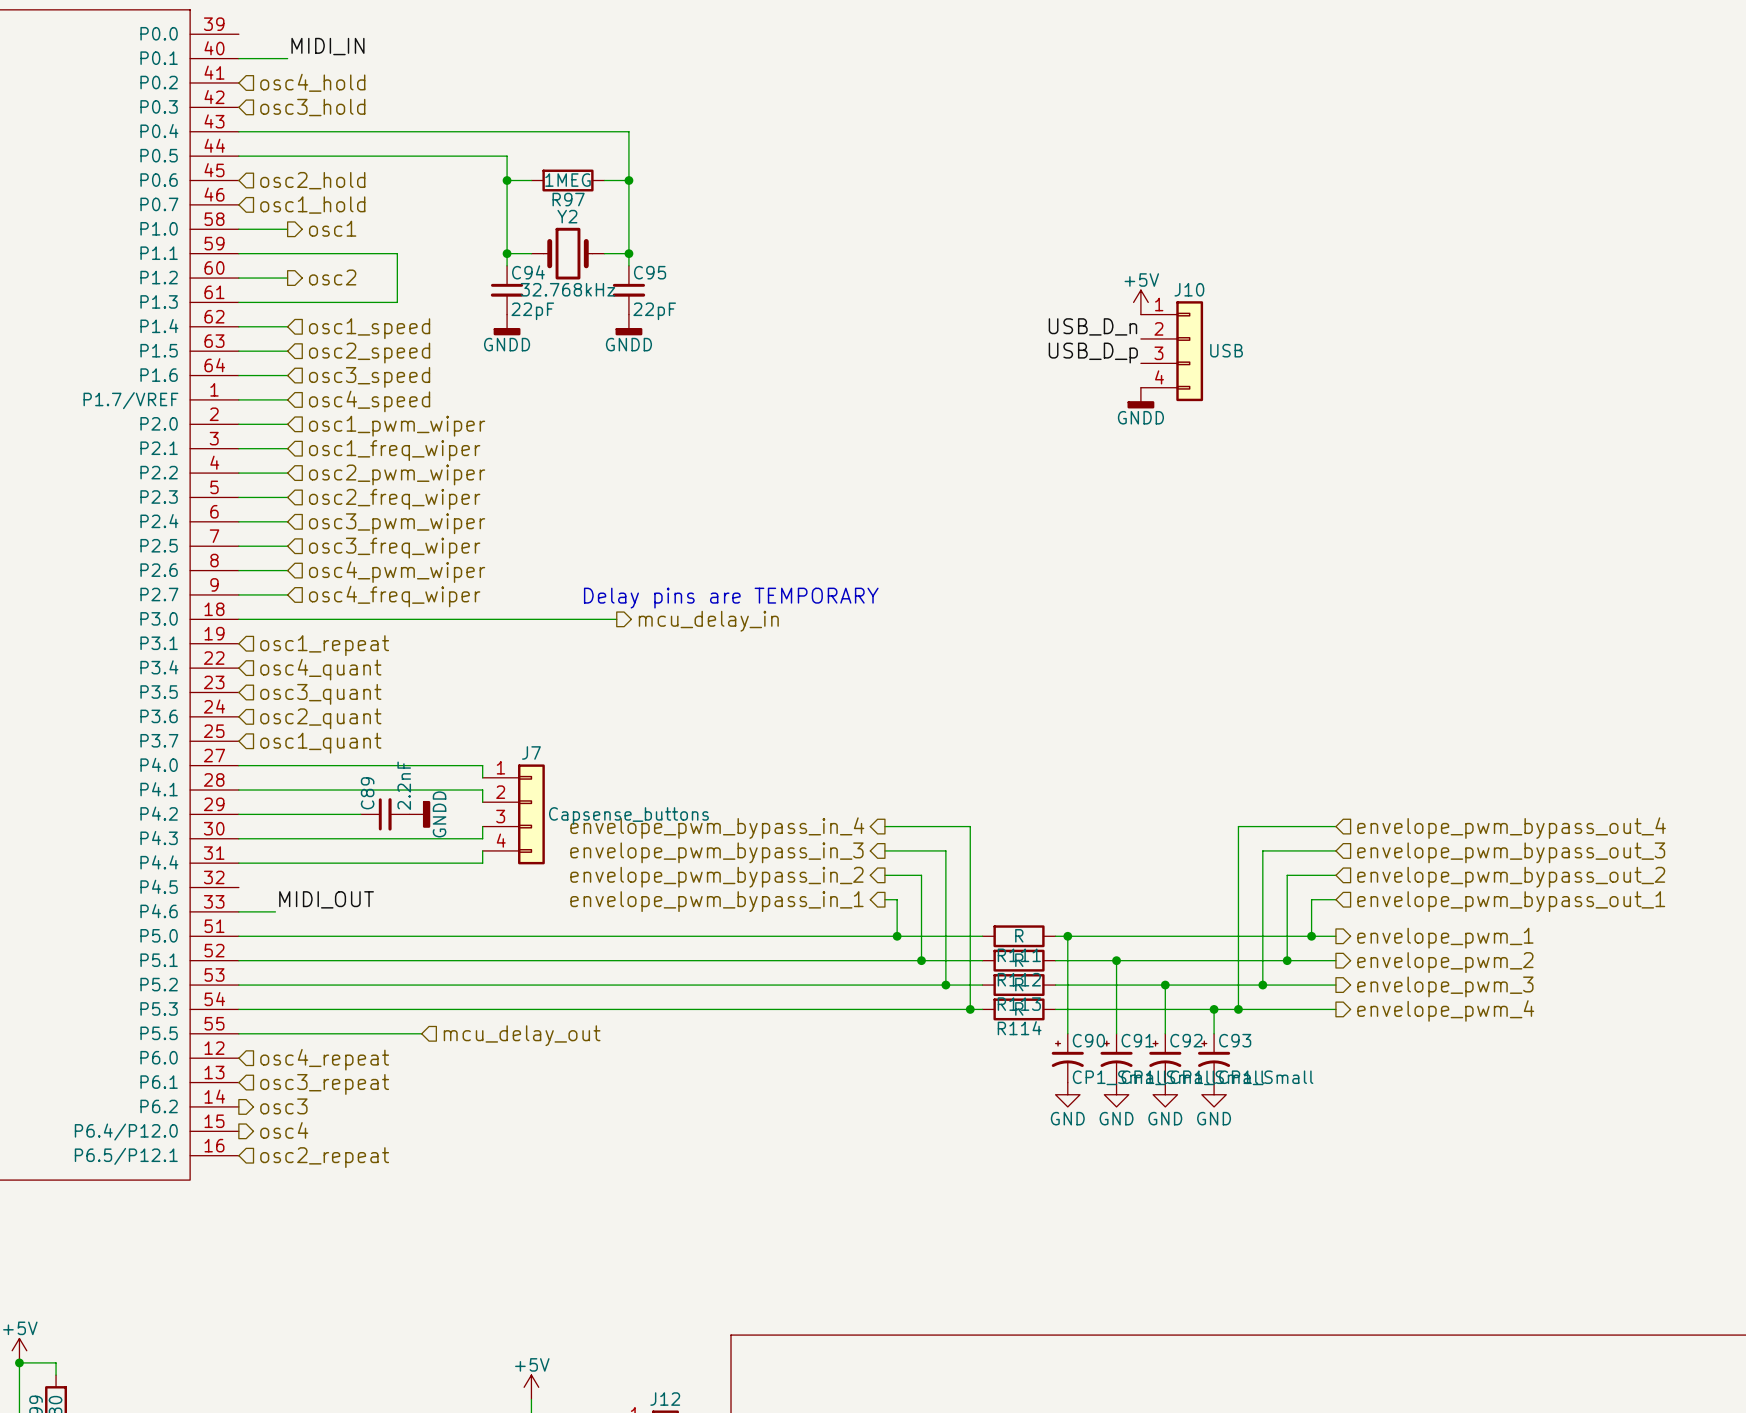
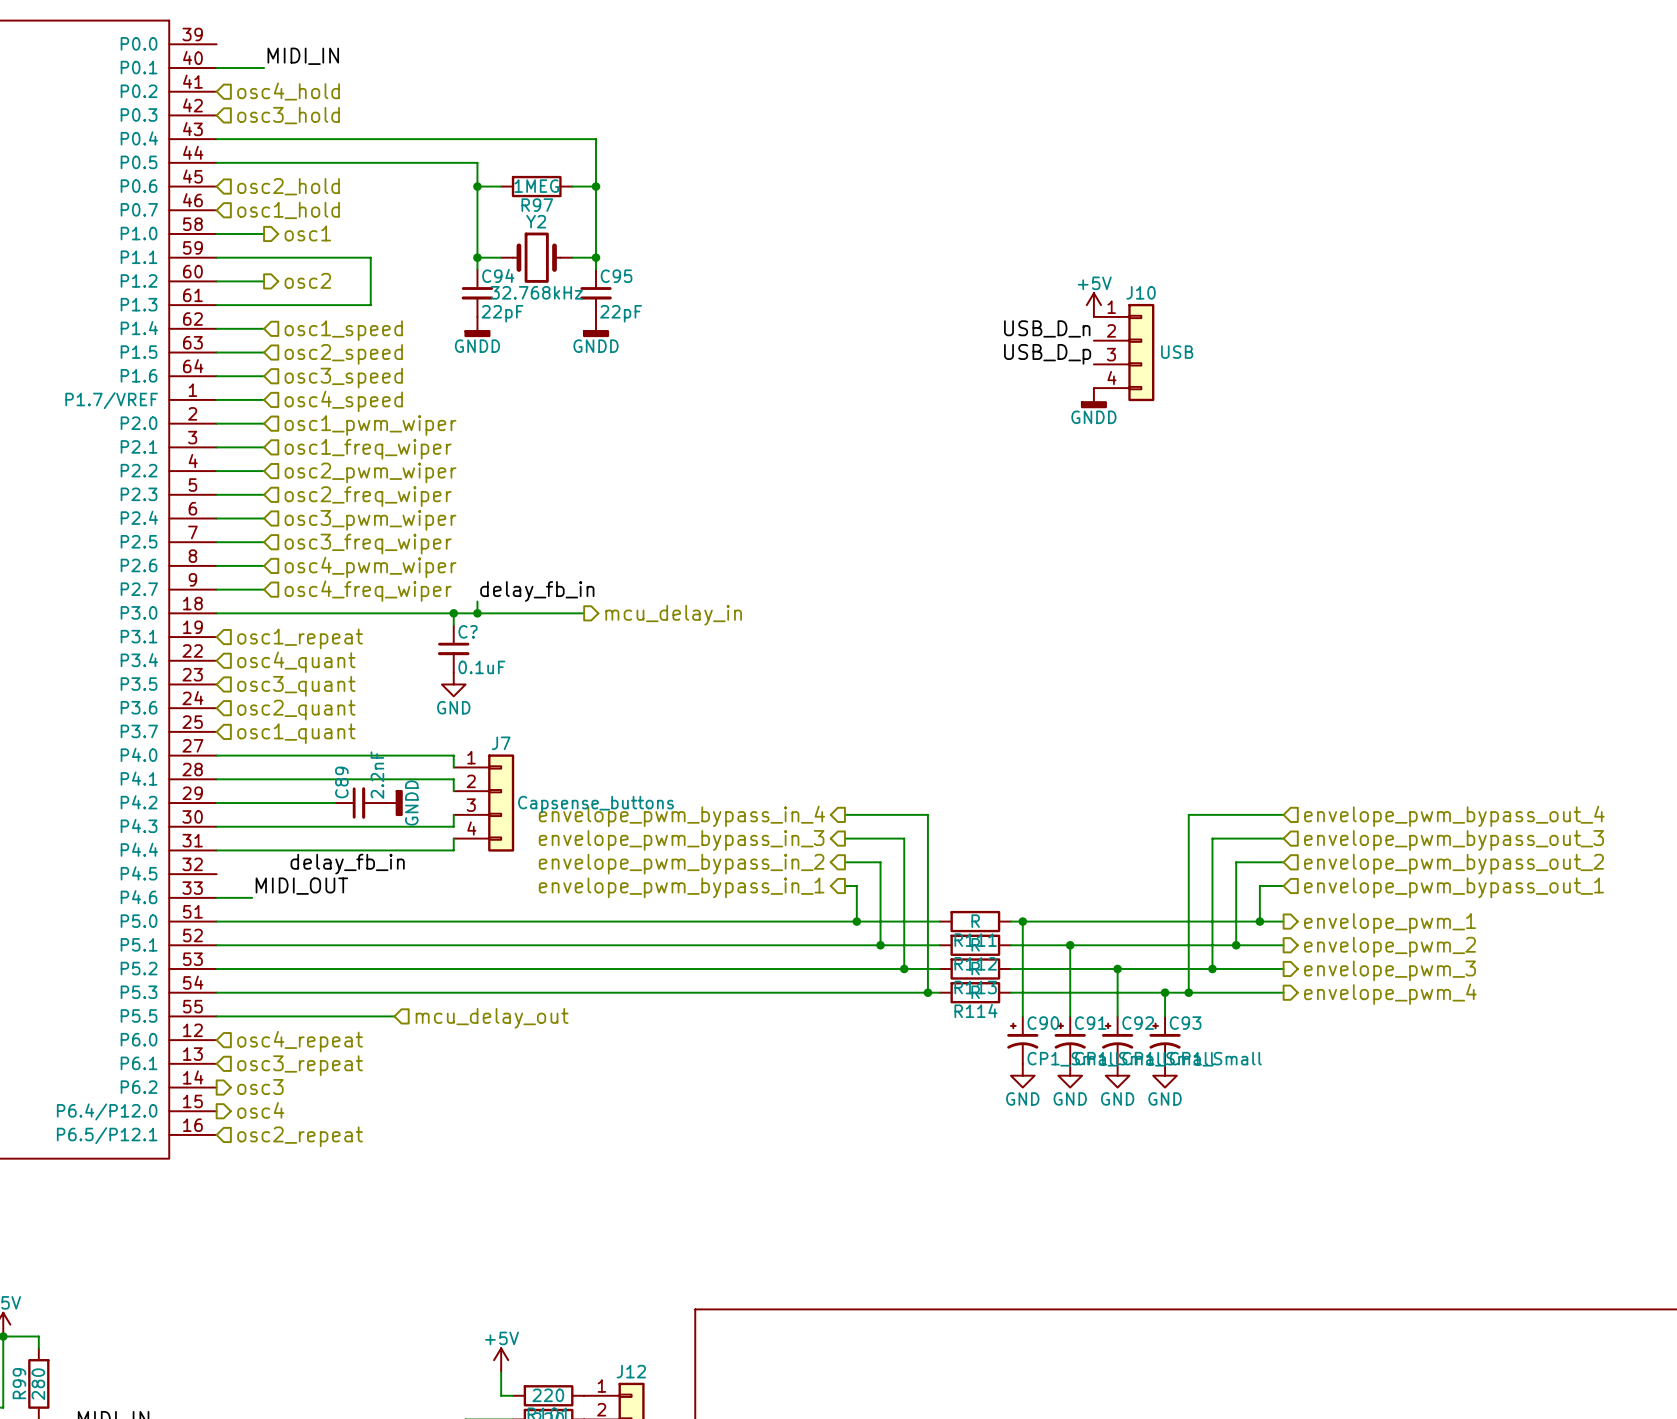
label: none -> delay_fb_in (537, 591)
text: Delay pins are TEMPORARY (731, 598) -> none
wire: none -> (477, 601) (477, 613)
wire: none -> (453, 613) (453, 625)
junction: none -> (453, 613)
junction: none -> (477, 613)
C?: none -> 0.1uF (453, 648)
power symbol: none -> GND (453, 684)
label: none -> delay_fb_in (347, 864)

